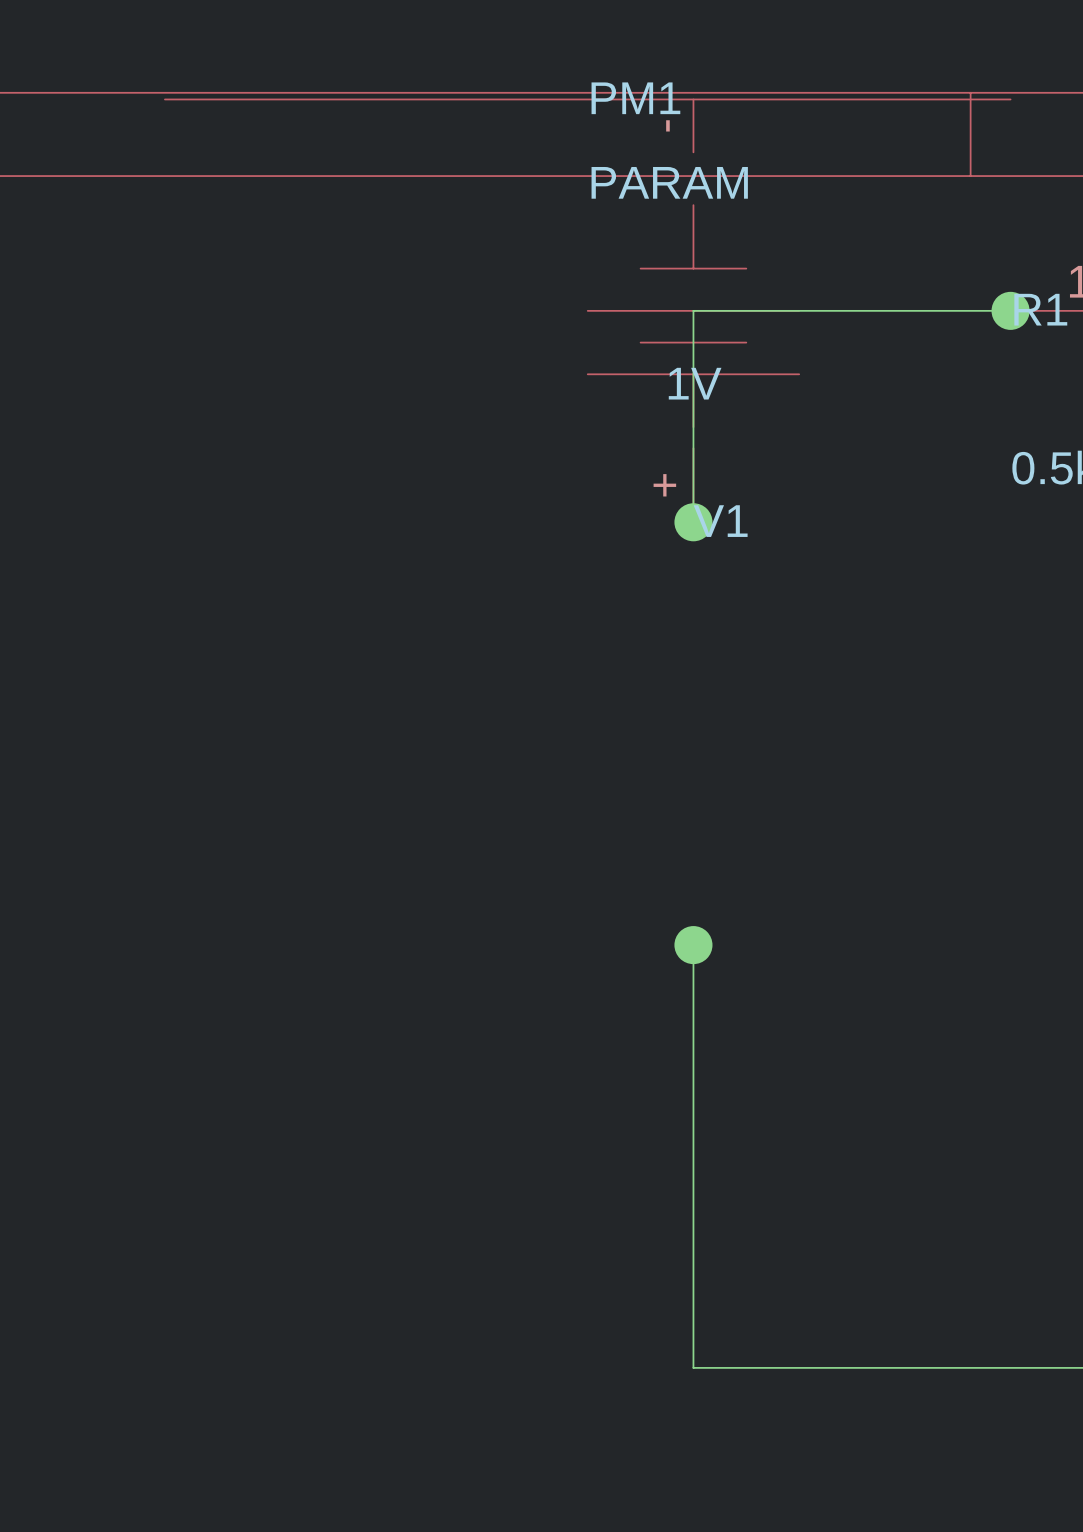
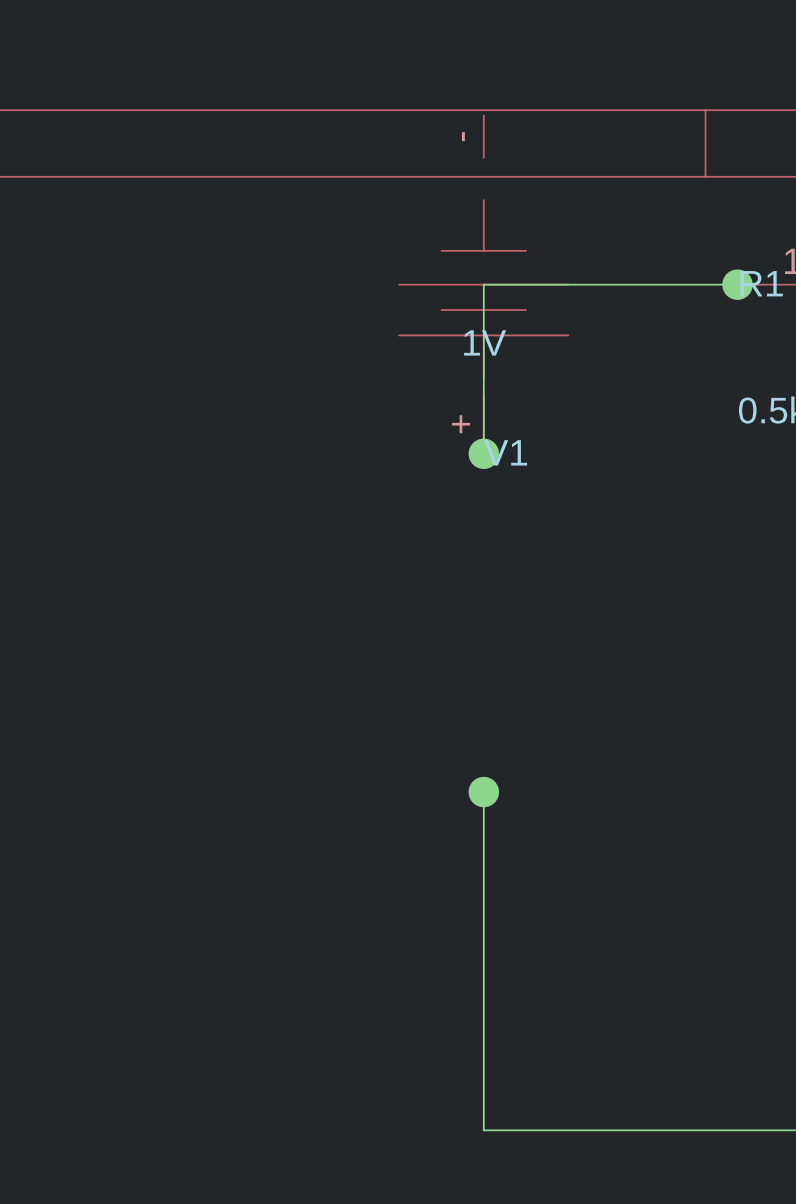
PM1: PARAM (587, 99) -> none

